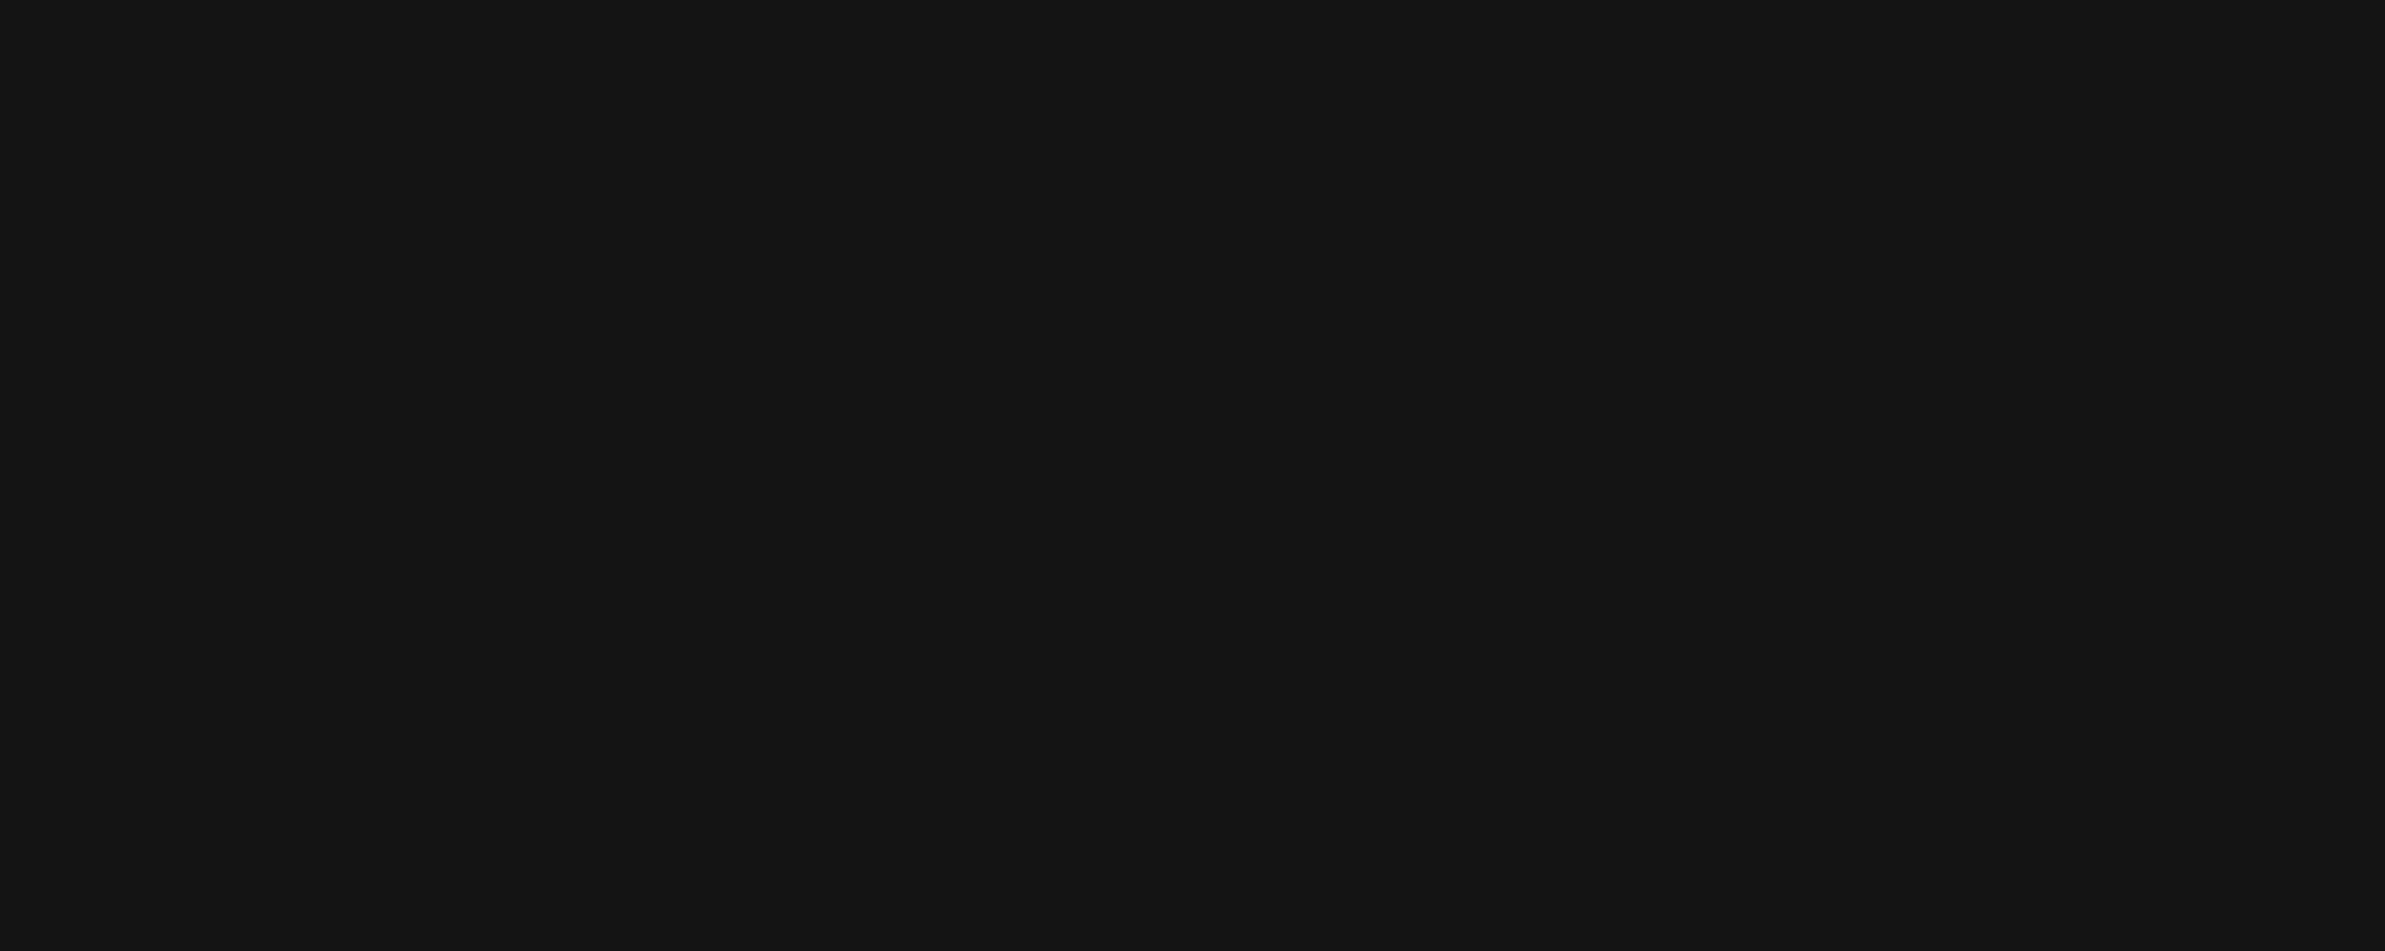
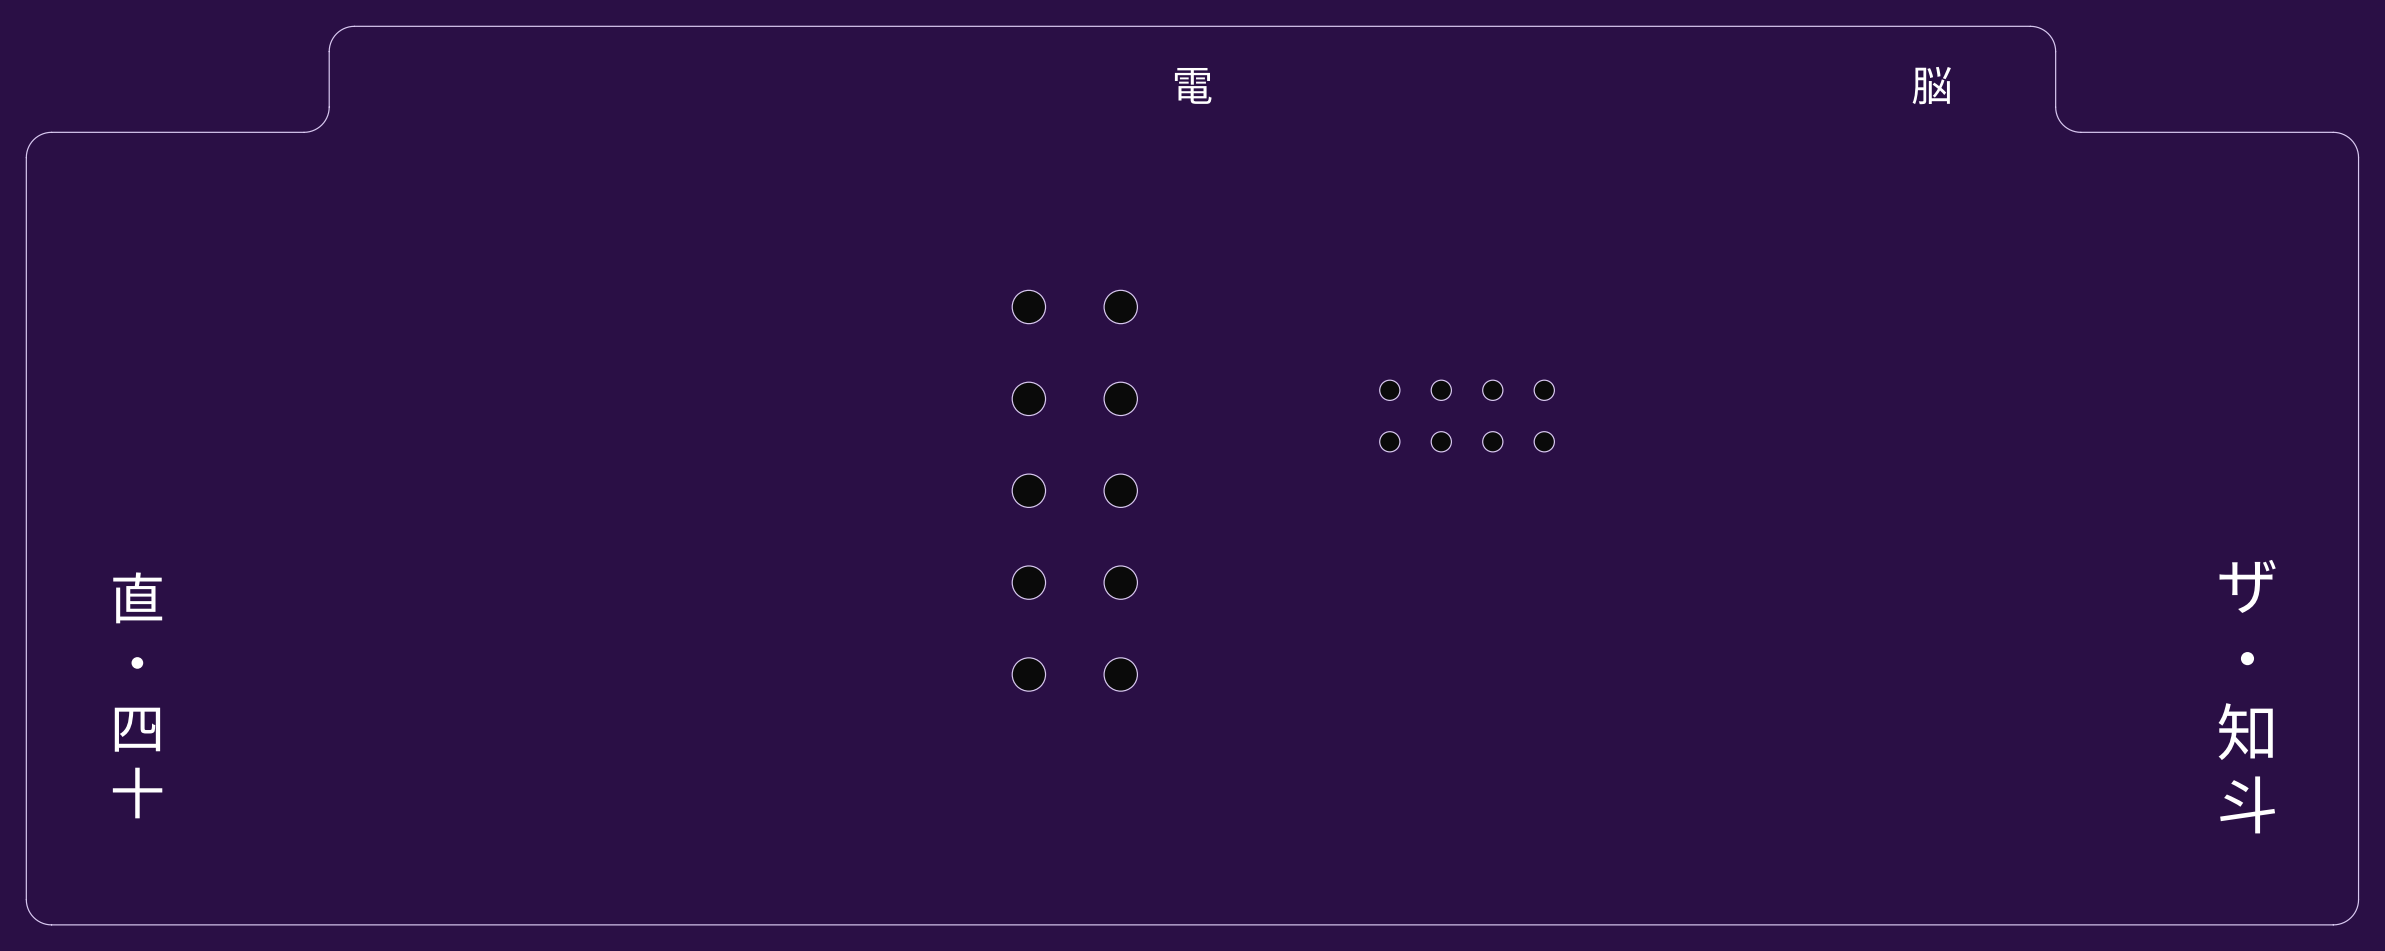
board edge: none -> (354, 26) (2030, 26) (2043, 30) (2054, 43) (2056, 112) (2061, 122) (2072, 130) (2333, 132) (2344, 134) (2354, 144) (2358, 157) (2358, 899) (2356, 910) (2346, 921) (2333, 924) (51, 924) (40, 922) (30, 913) (26, 899) (27, 149) (35, 137) (48, 132) (312, 130) (323, 122) (328, 112) (330, 43) (338, 31) (354, 26)
text: none -> 電 (1193, 85)
text: none -> 脳 (1931, 85)
part: none -> (1028, 306)
part: none -> (1120, 306)
part: none -> (1389, 390)
part: none -> (1441, 390)
part: none -> (1492, 390)
part: none -> (1544, 390)
part: none -> (1028, 398)
part: none -> (1120, 398)
part: none -> (1389, 441)
part: none -> (1441, 441)
part: none -> (1492, 441)
part: none -> (1544, 441)
part: none -> (1028, 490)
part: none -> (1120, 490)
part: none -> (1028, 582)
part: none -> (1120, 582)
text: none -> ザ (2247, 586)
text: none -> 直 (137, 597)
text: none -> ・ (2247, 658)
text: none -> ・ (137, 662)
part: none -> (1028, 674)
part: none -> (1120, 674)
text: none -> 四 (137, 729)
text: none -> 知 (2245, 731)
text: none -> 十 (137, 793)
text: none -> 斗 (2247, 804)

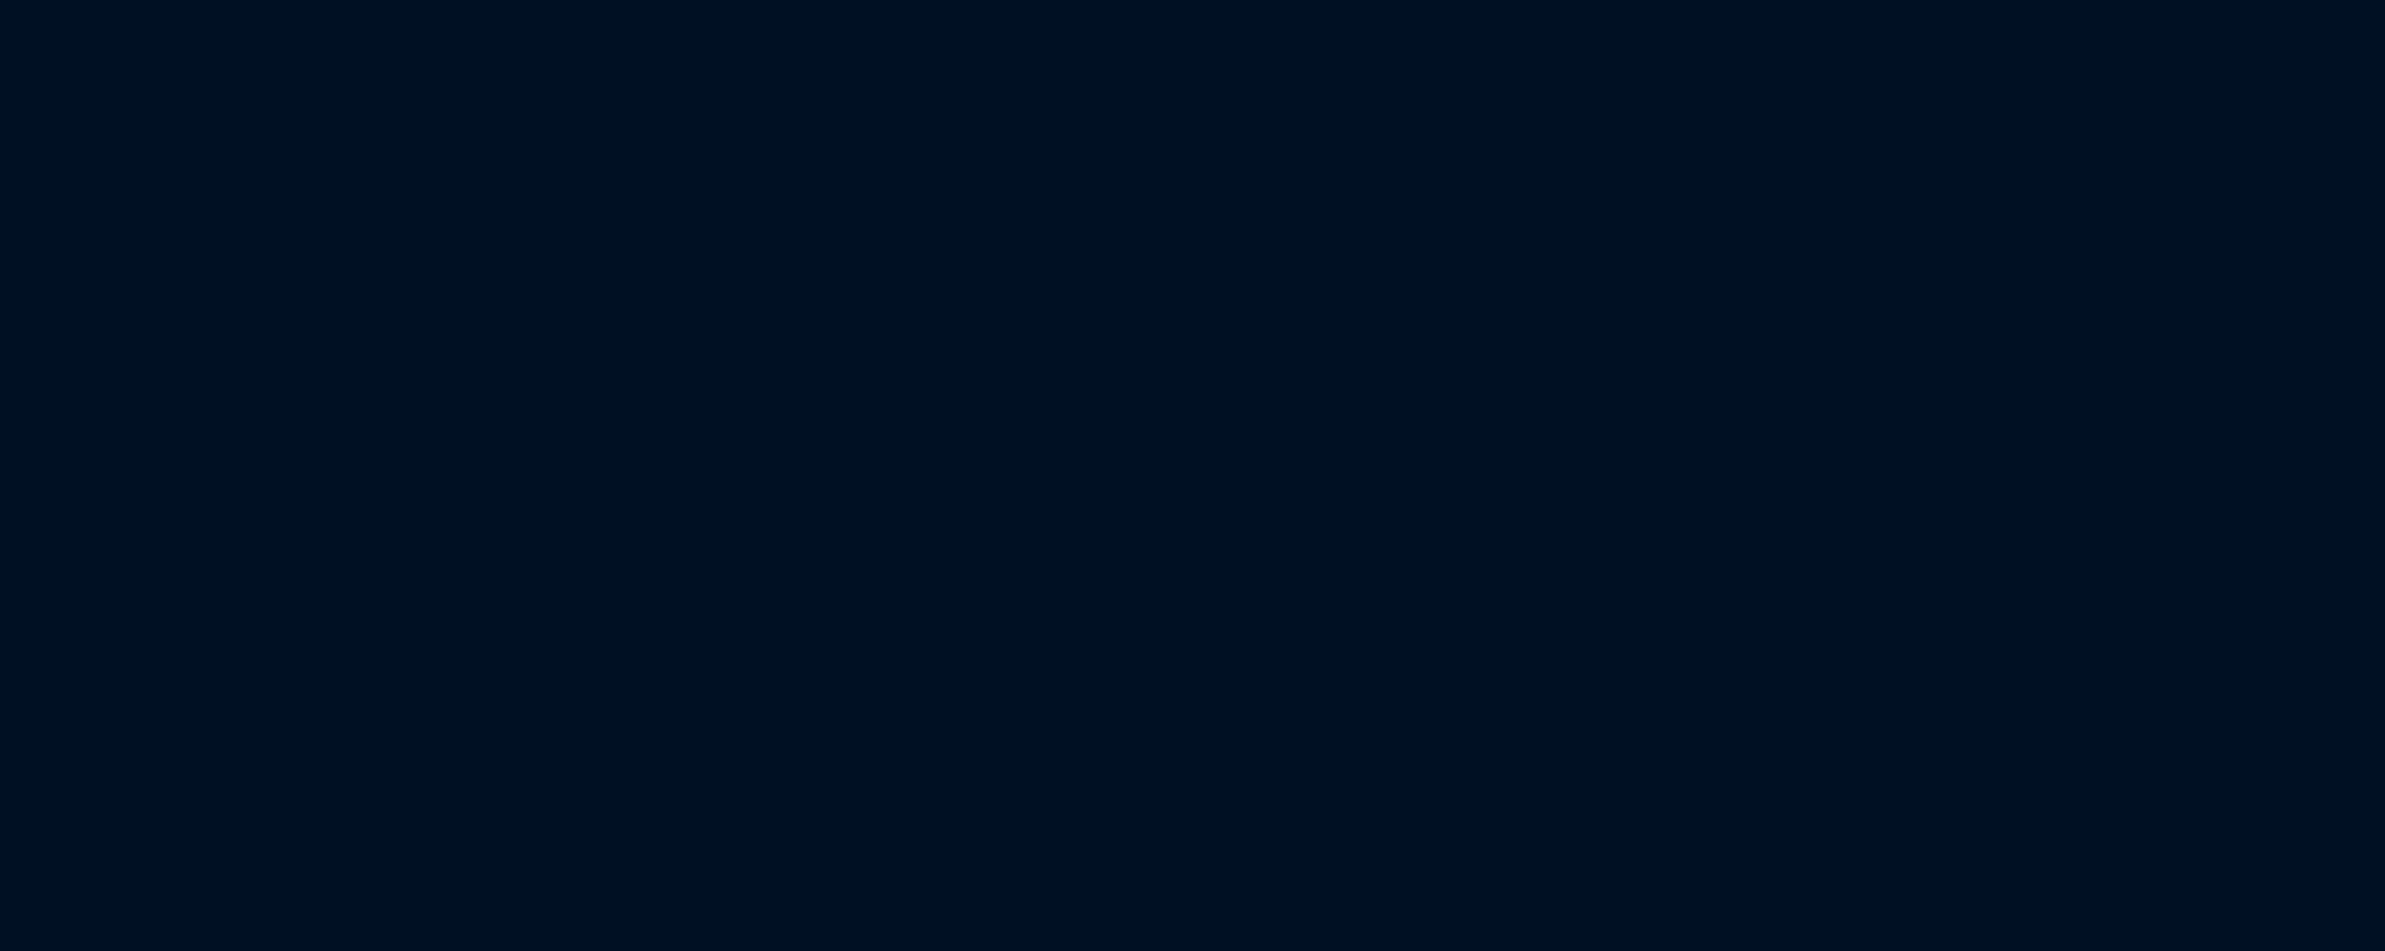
board edge: (354, 26) (2030, 26) (2043, 30) (2054, 43) (2056, 112) (2061, 122) (2072, 130) (2333, 132) (2344, 134) (2354, 144) (2358, 157) (2358, 899) (2356, 910) (2346, 921) (2333, 924) (51, 924) (40, 922) (30, 913) (26, 899) (27, 149) (35, 137) (48, 132) (312, 130) (323, 122) (328, 112) (330, 43) (338, 31) (354, 26) -> none
text: 電 (1193, 85) -> none
text: 脳 (1931, 85) -> none
part: (1028, 306) -> none
part: (1120, 306) -> none
part: (1389, 390) -> none
part: (1441, 390) -> none
part: (1492, 390) -> none
part: (1544, 390) -> none
part: (1028, 398) -> none
part: (1120, 398) -> none
part: (1389, 441) -> none
part: (1441, 441) -> none
part: (1492, 441) -> none
part: (1544, 441) -> none
part: (1028, 490) -> none
part: (1120, 490) -> none
part: (1028, 582) -> none
part: (1120, 582) -> none
text: ザ (2247, 586) -> none
text: 直 (137, 597) -> none
text: ・ (2247, 658) -> none
text: ・ (137, 662) -> none
part: (1028, 674) -> none
part: (1120, 674) -> none
text: 四 (137, 729) -> none
text: 知 (2245, 731) -> none
text: 十 (137, 793) -> none
text: 斗 (2247, 804) -> none

